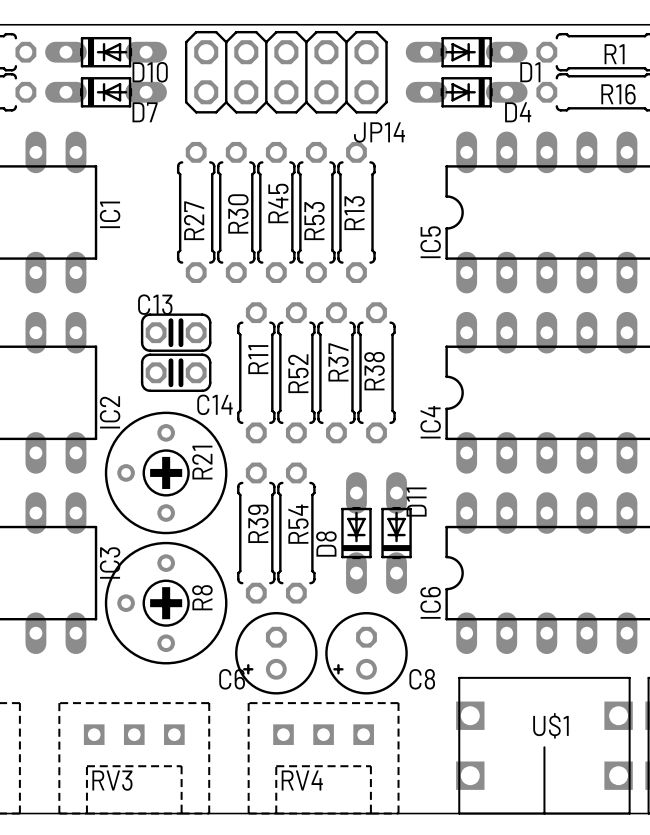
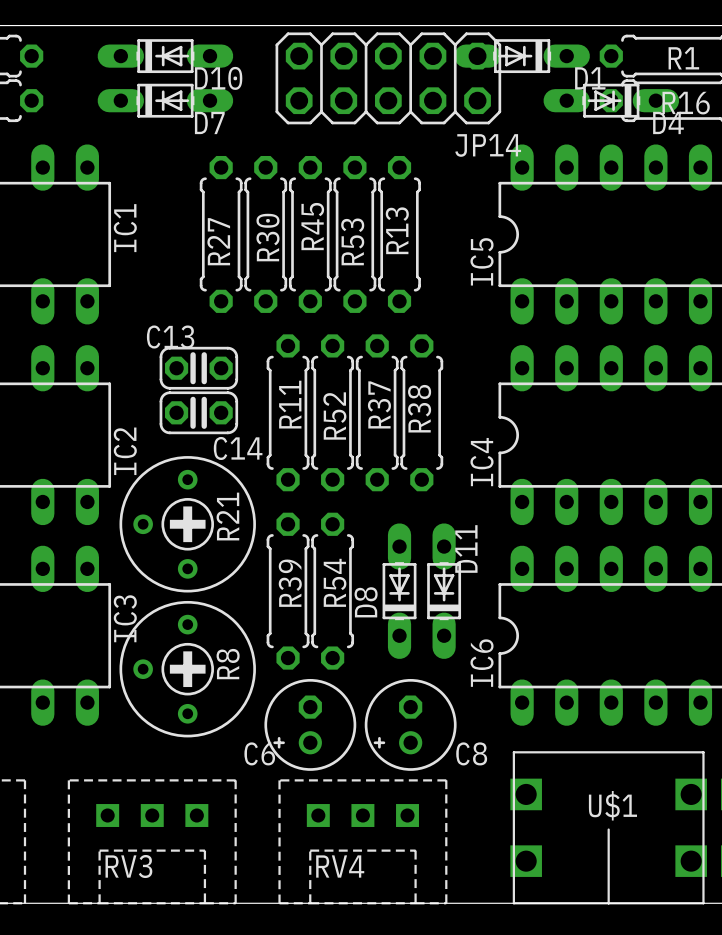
D10 position: (106, 52) -> (165, 56)
JP14 position: (286, 72) -> (388, 78)
D7 position: (106, 92) -> (165, 100)
D4 position: (466, 92) -> (611, 100)

